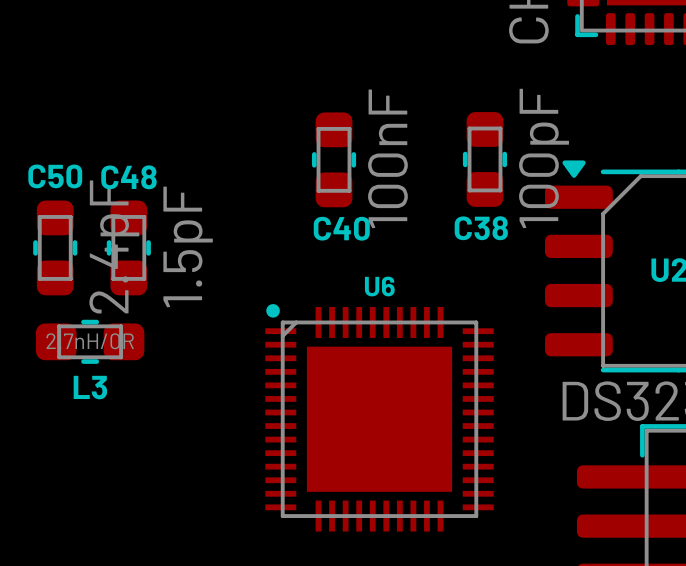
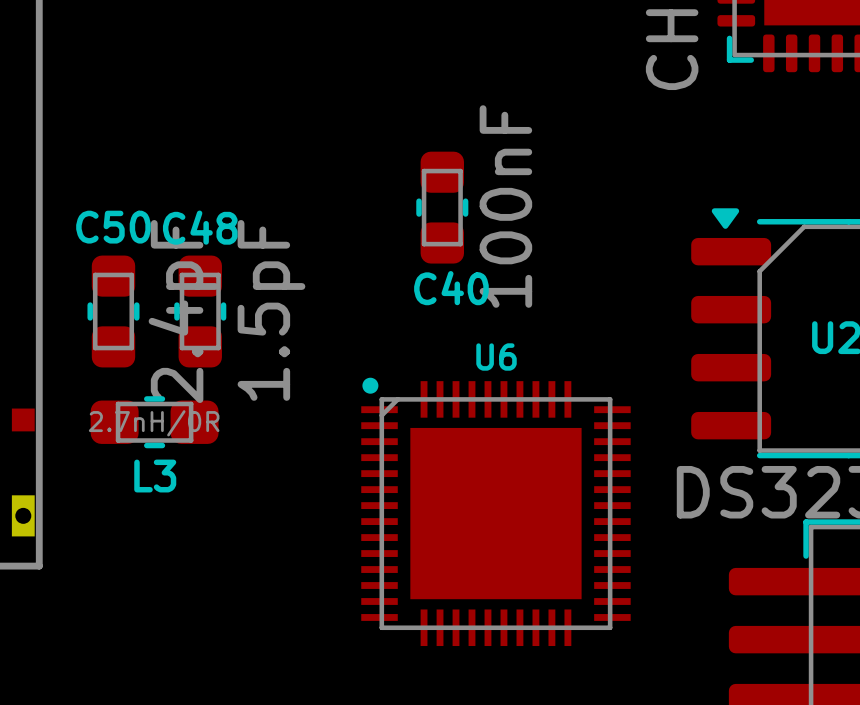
C38: 100pF (485, 159) -> none

